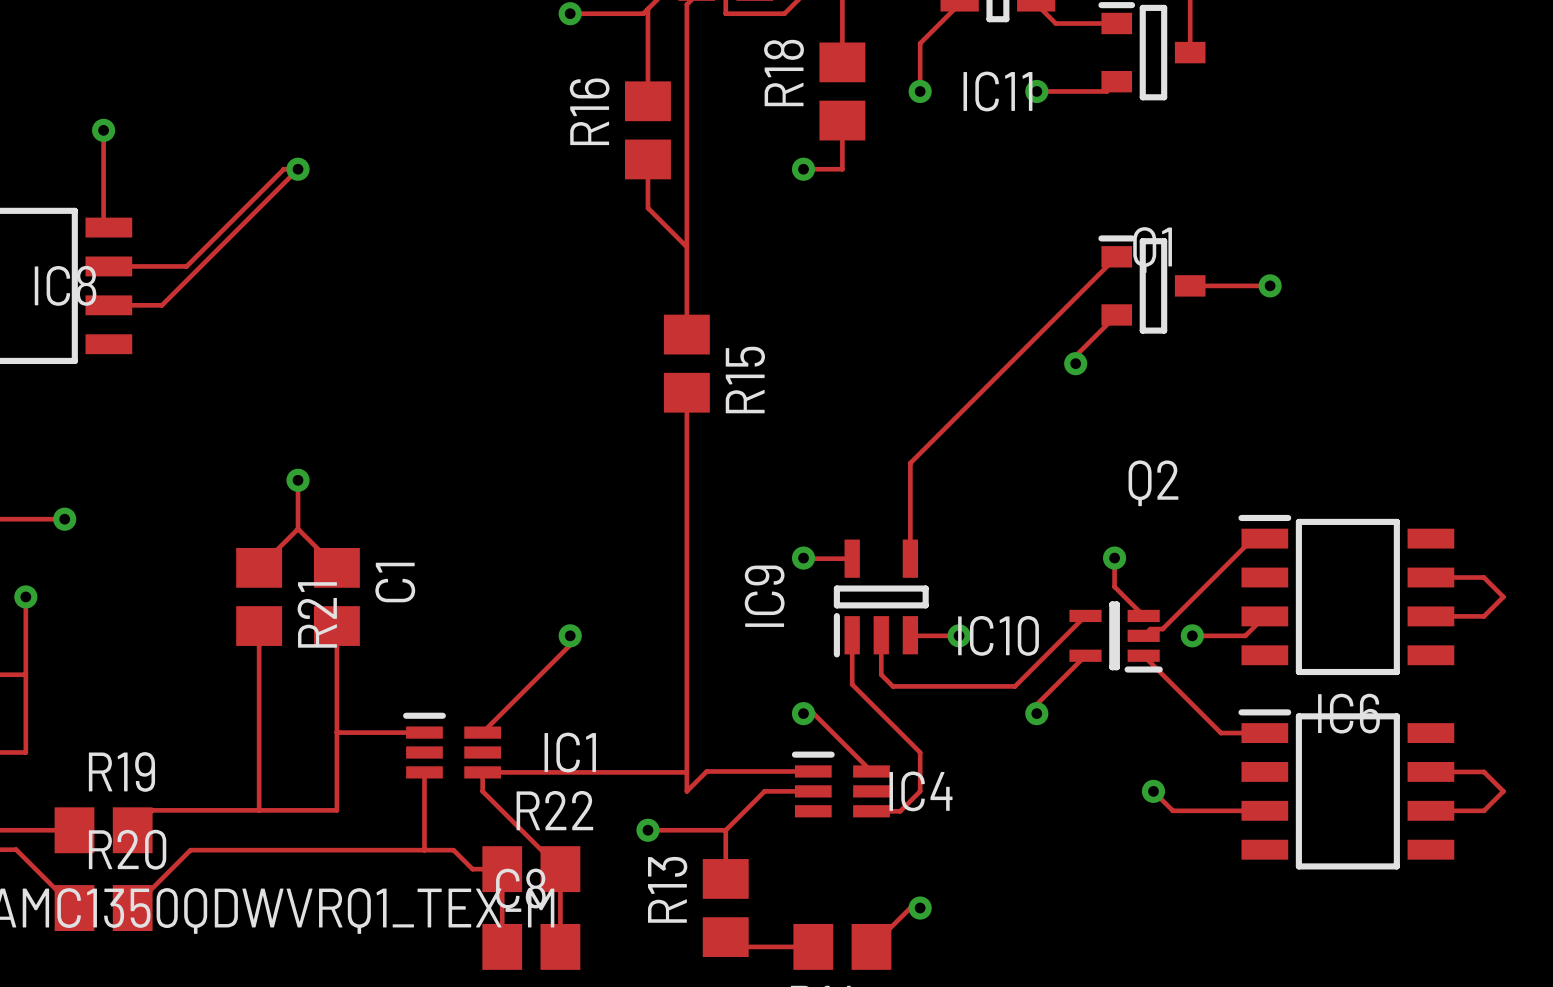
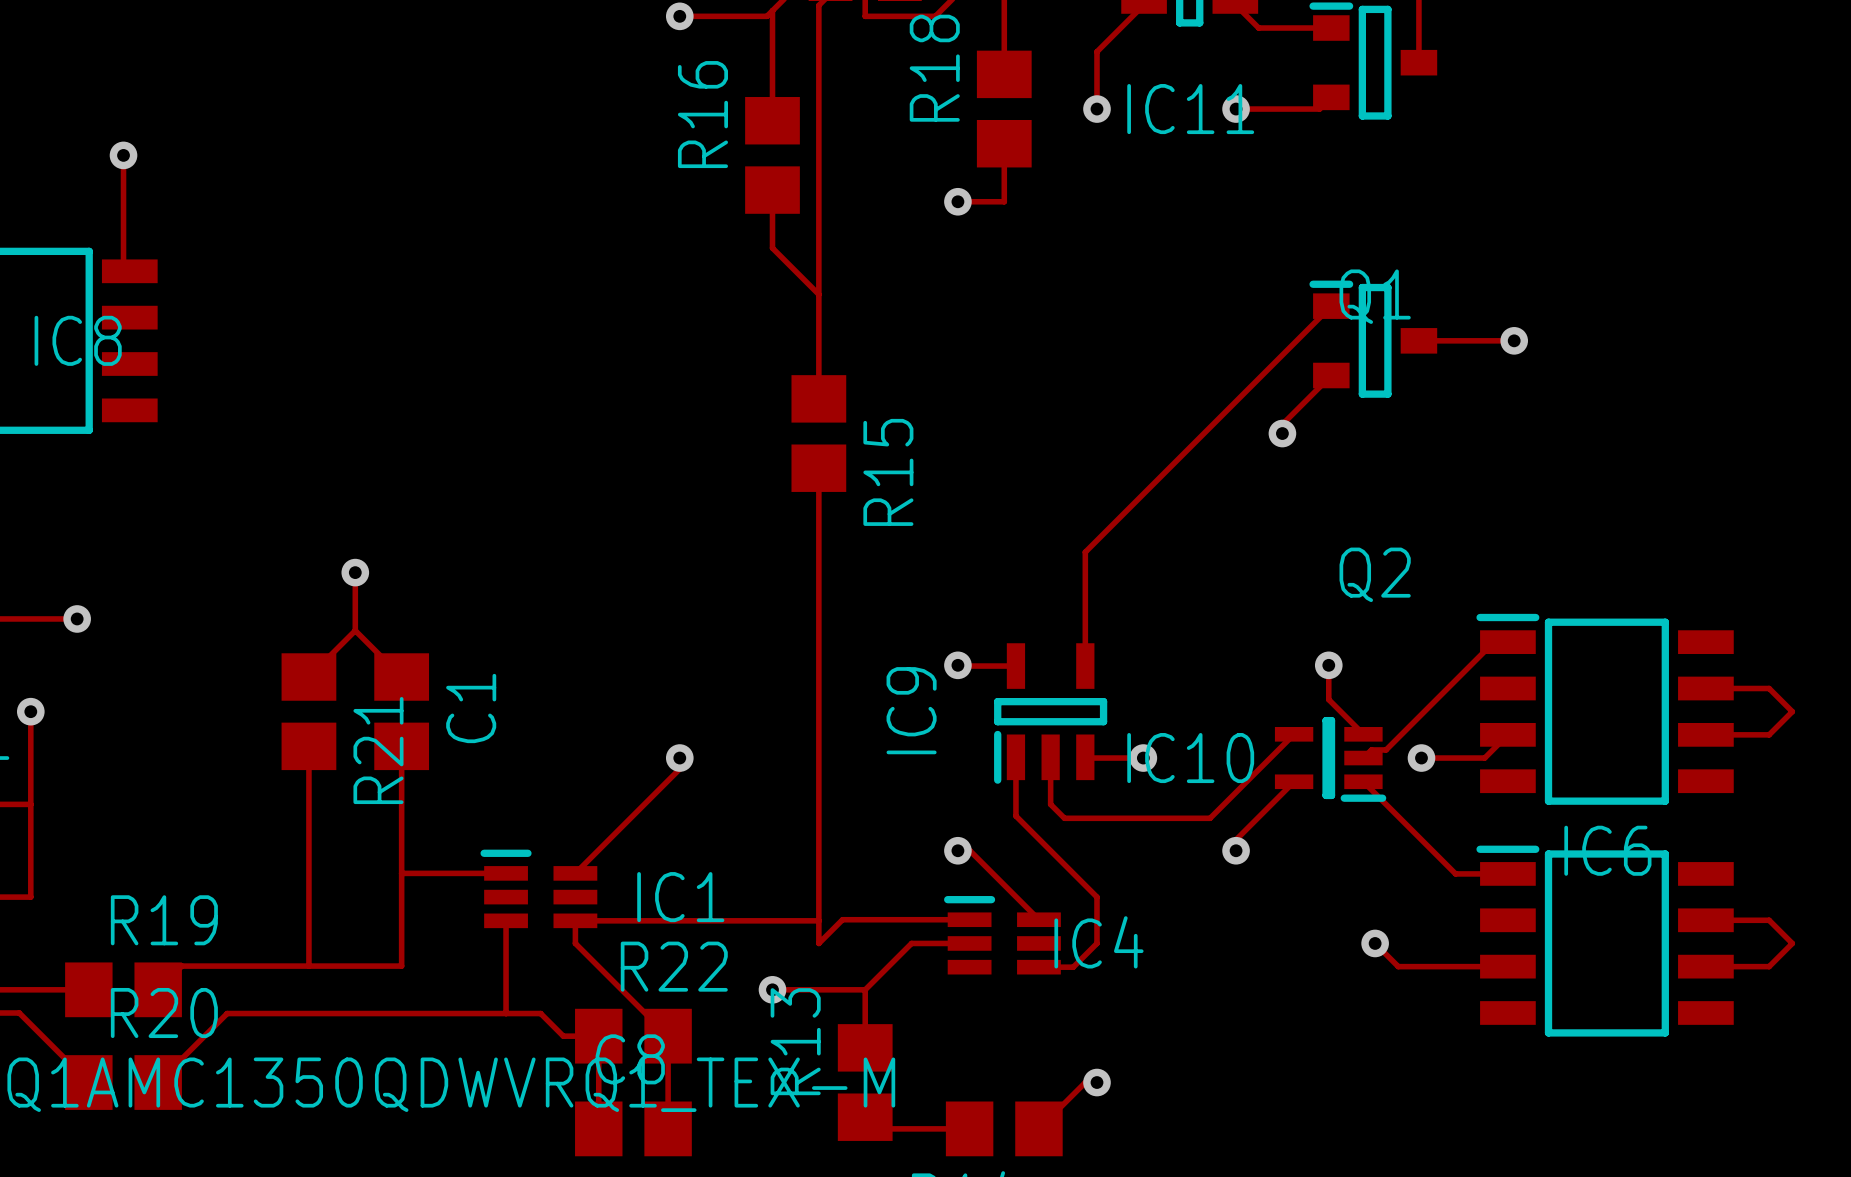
via: (298, 169) -> none
track: (108, 266) (186, 266) (283, 169) (298, 169) (161, 305) (108, 305) -> none

